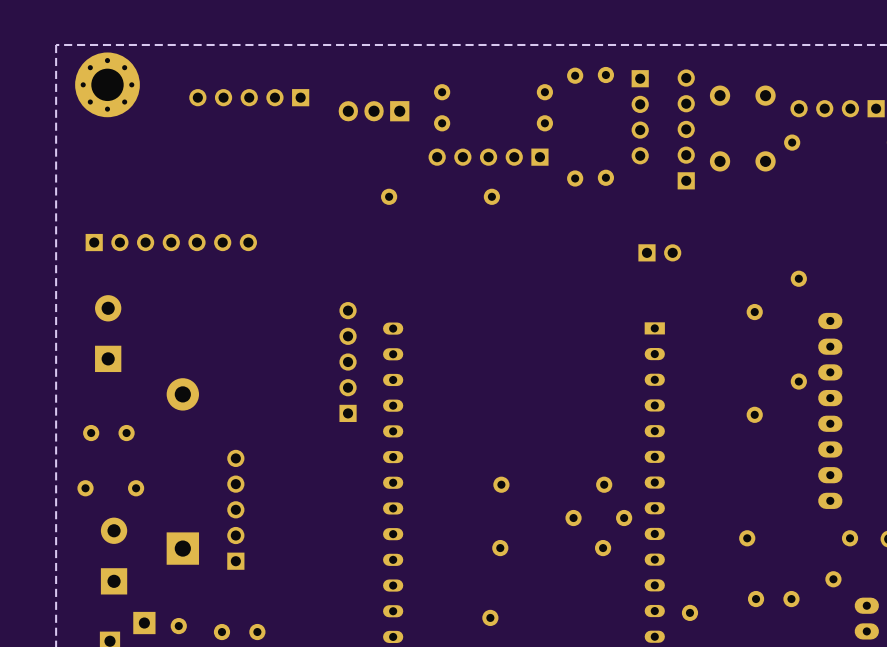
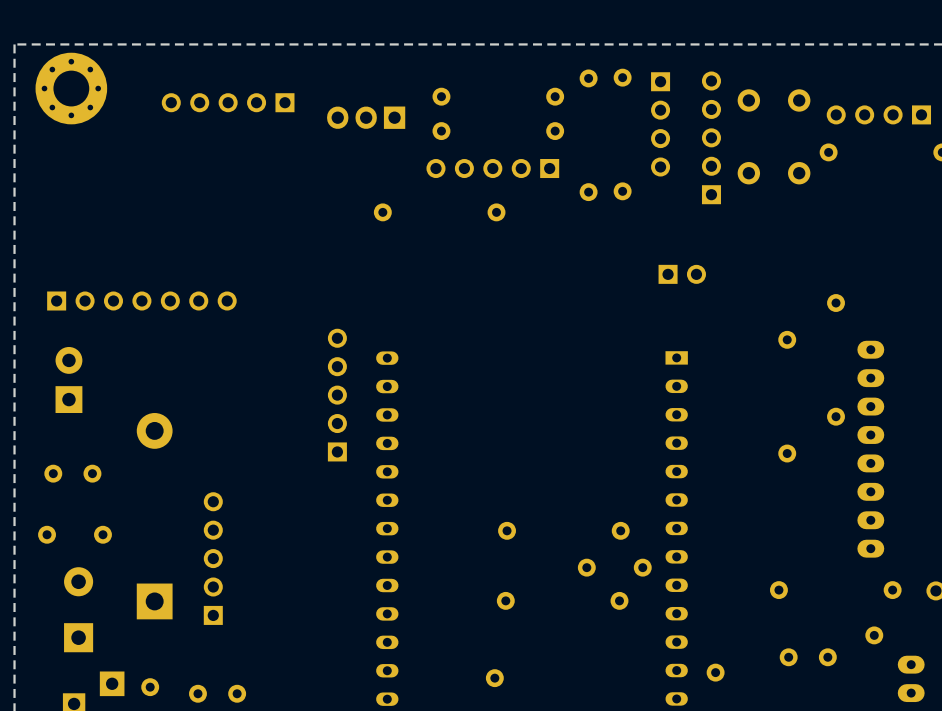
part position: (171, 242) -> (141, 301)
part: (108, 333) -> none
part: none -> (68, 379)

